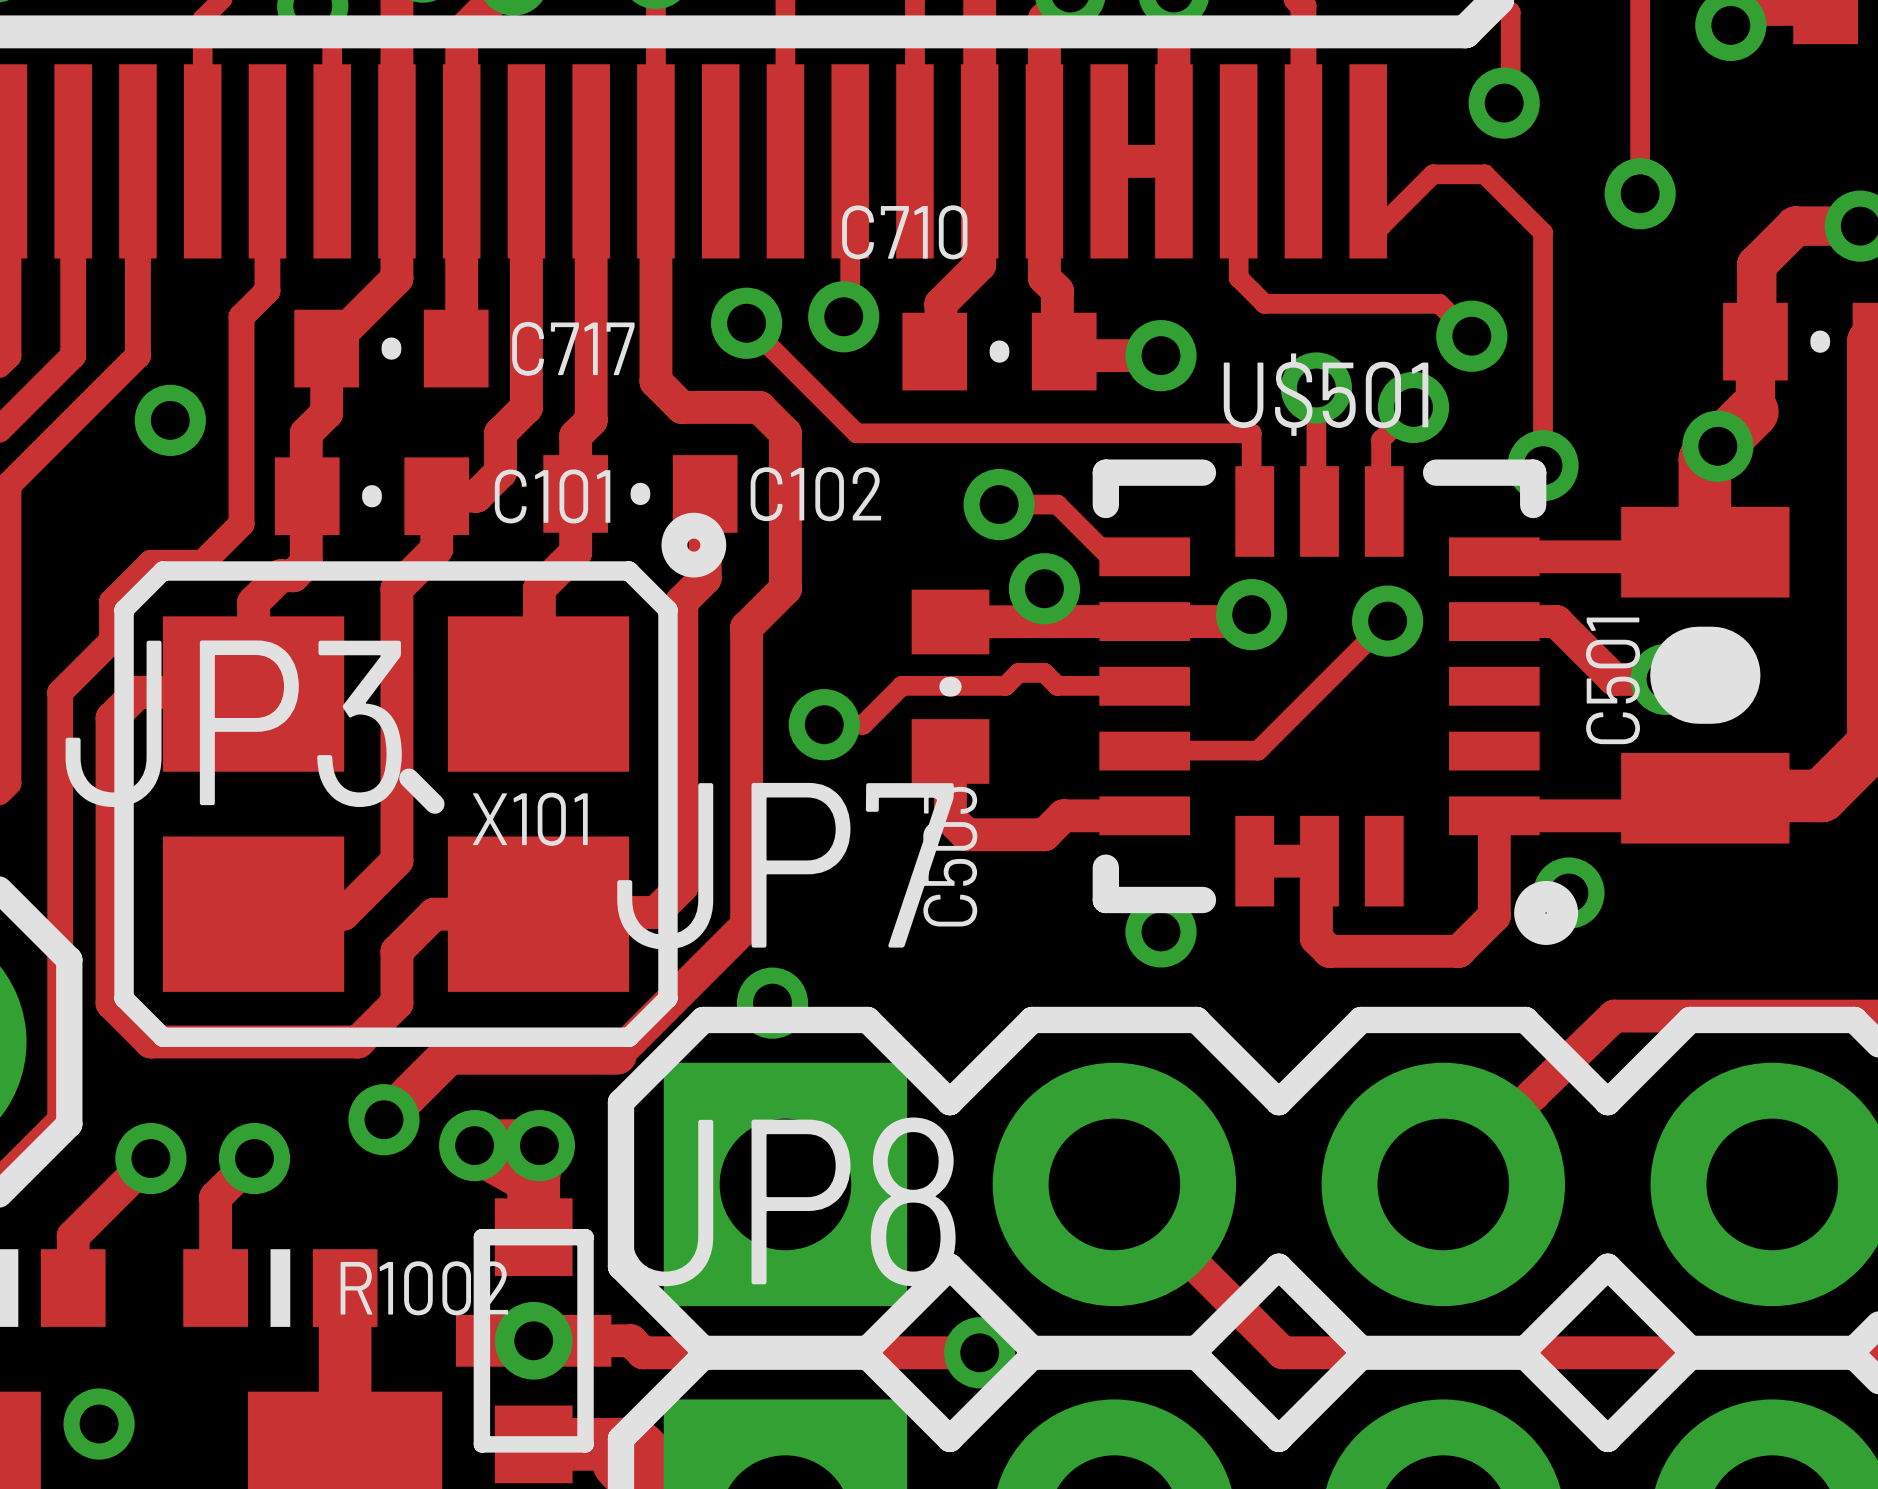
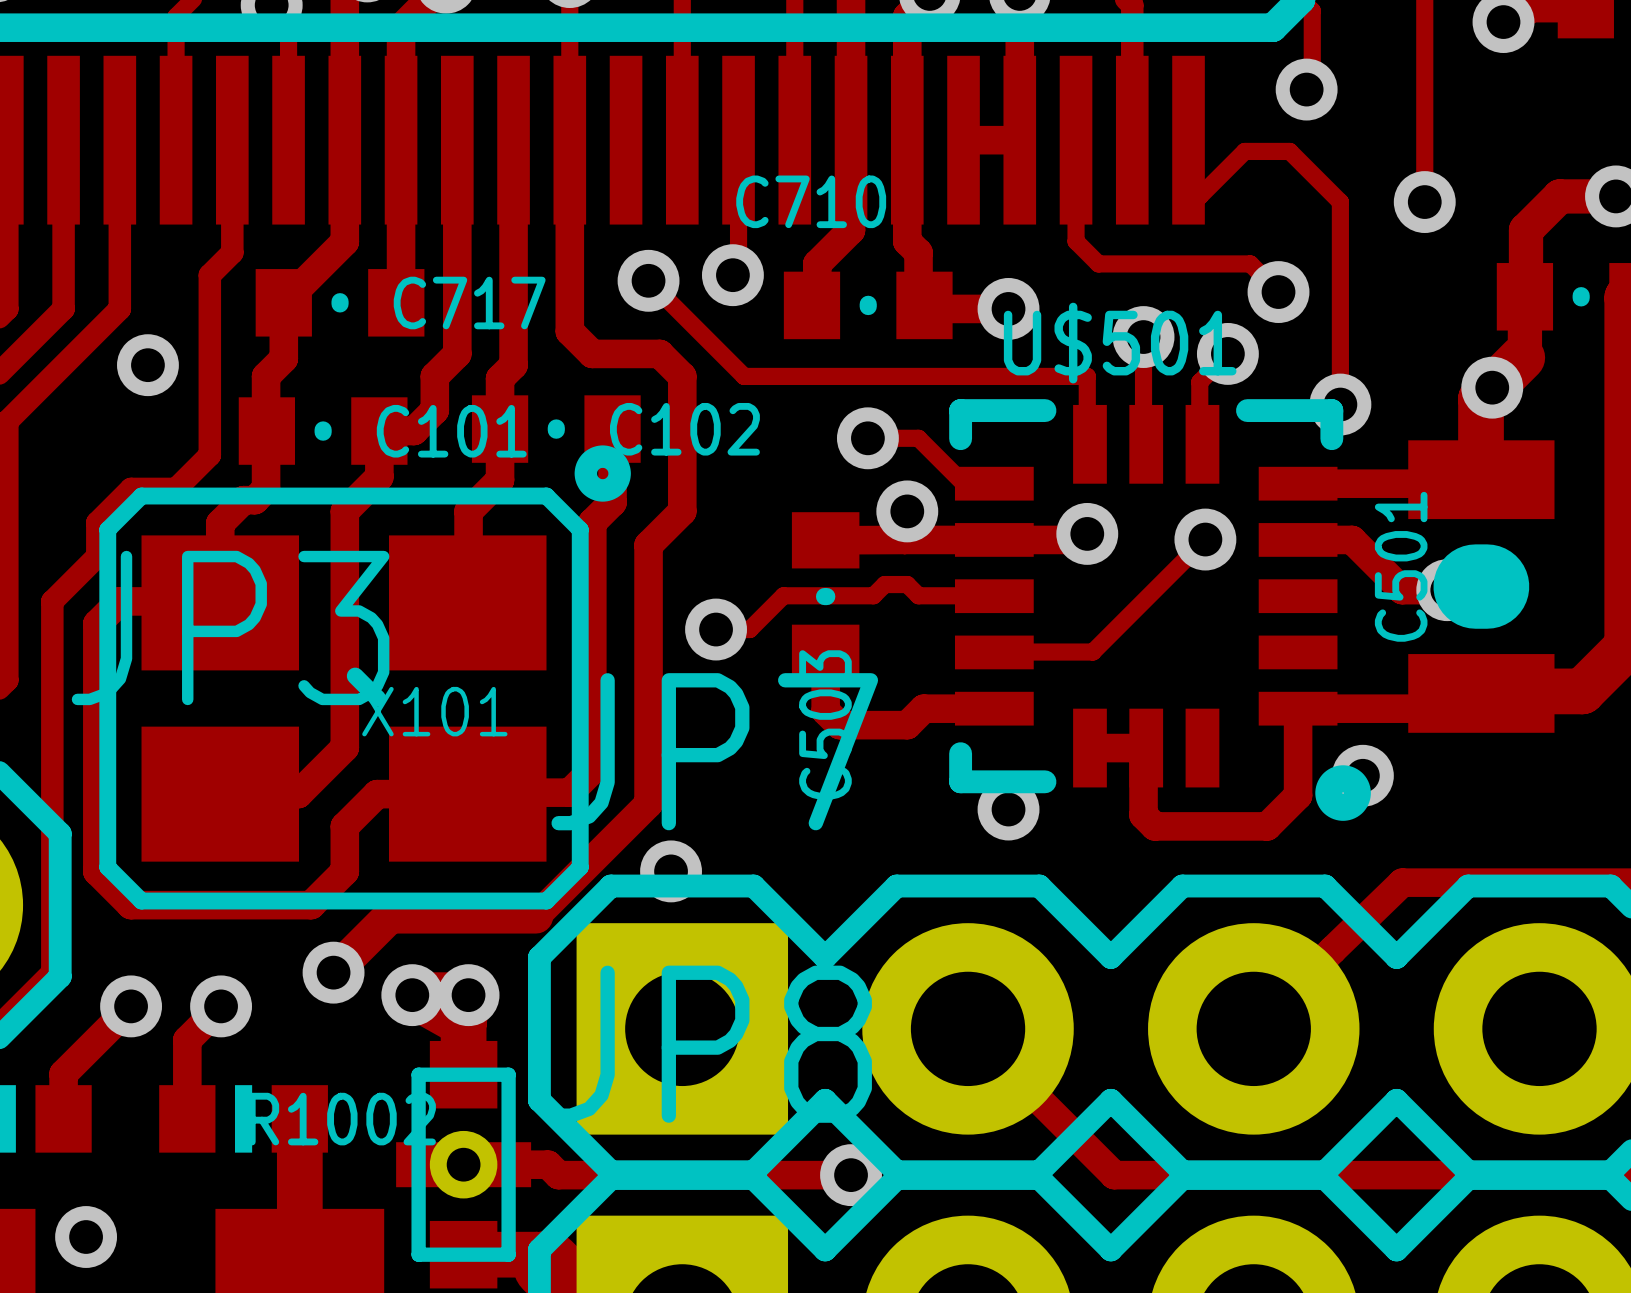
via position: (1640, 193) -> (1424, 202)

